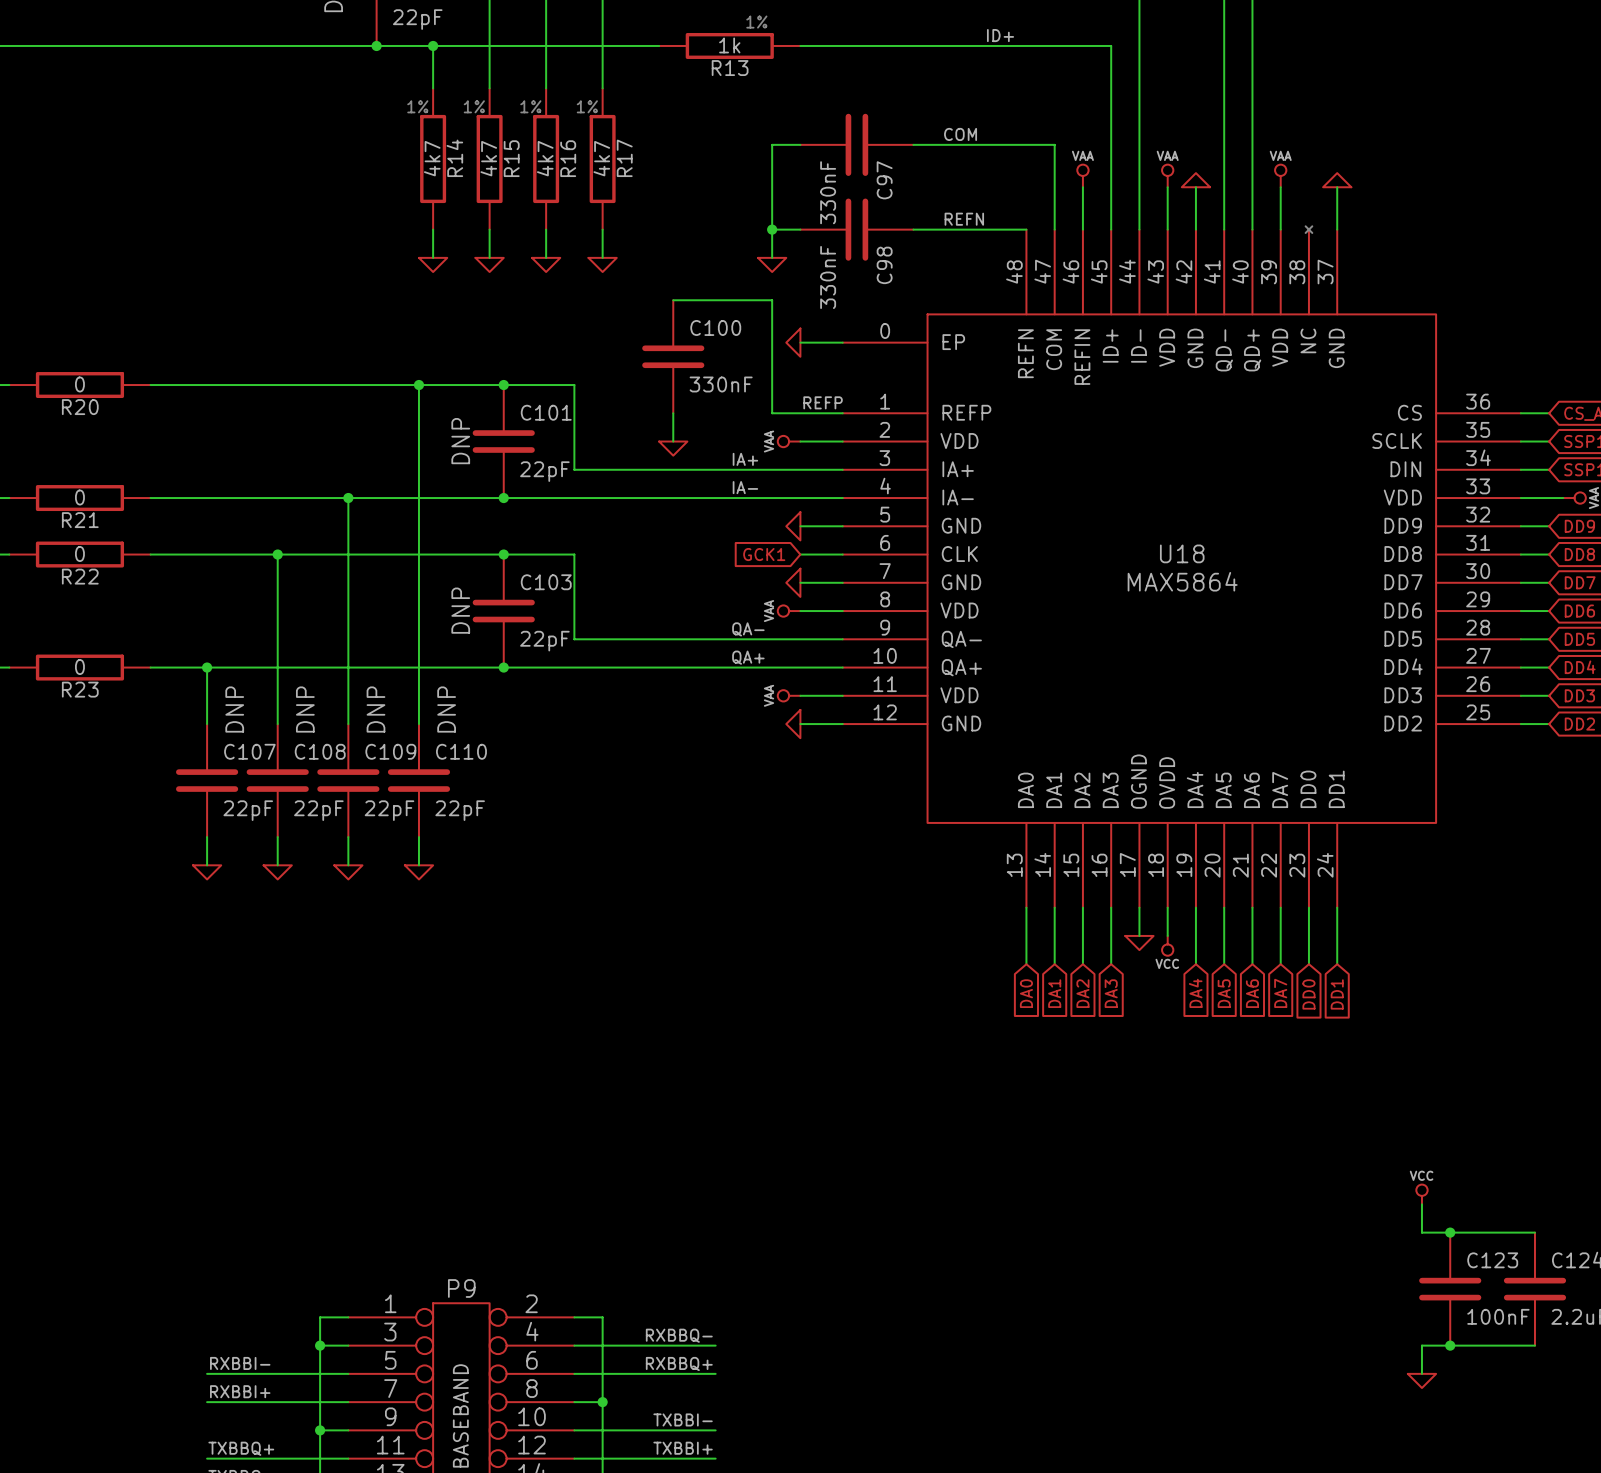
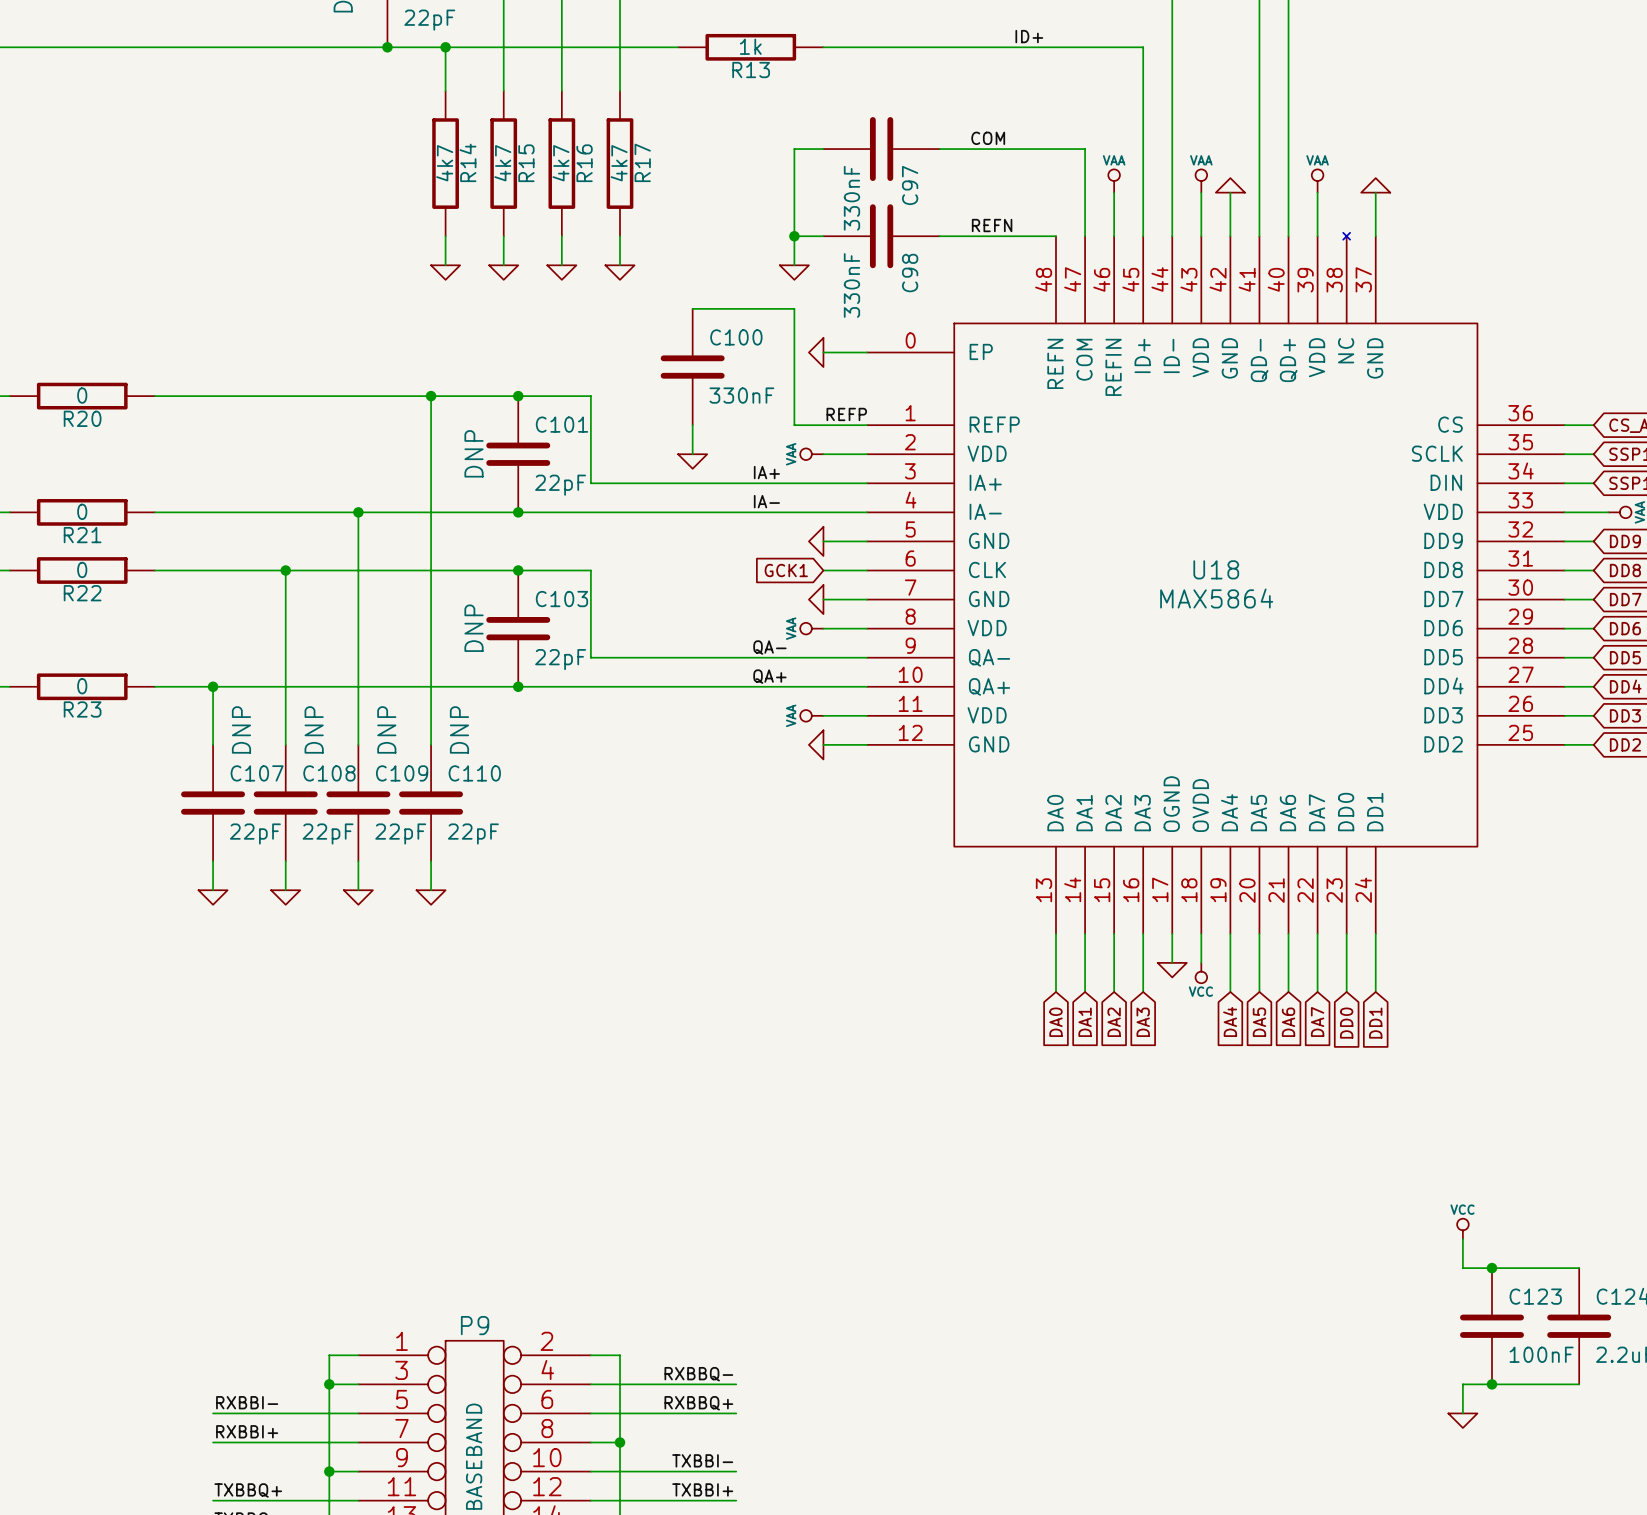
text: 1% (756, 22) -> none
text: 1% (417, 106) -> none
text: 1% (474, 106) -> none
text: 1% (530, 106) -> none
text: 1% (587, 106) -> none

